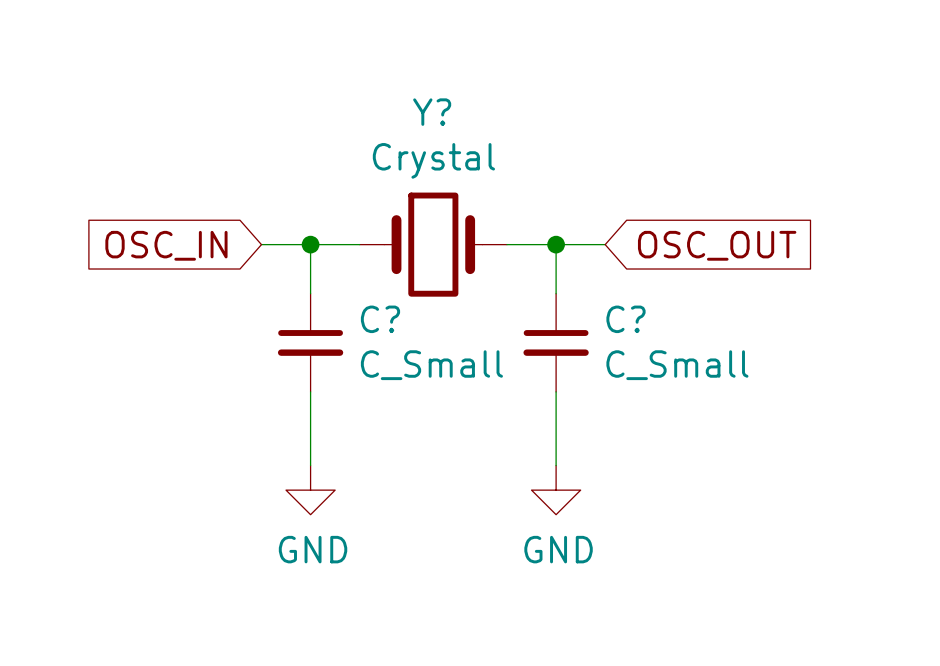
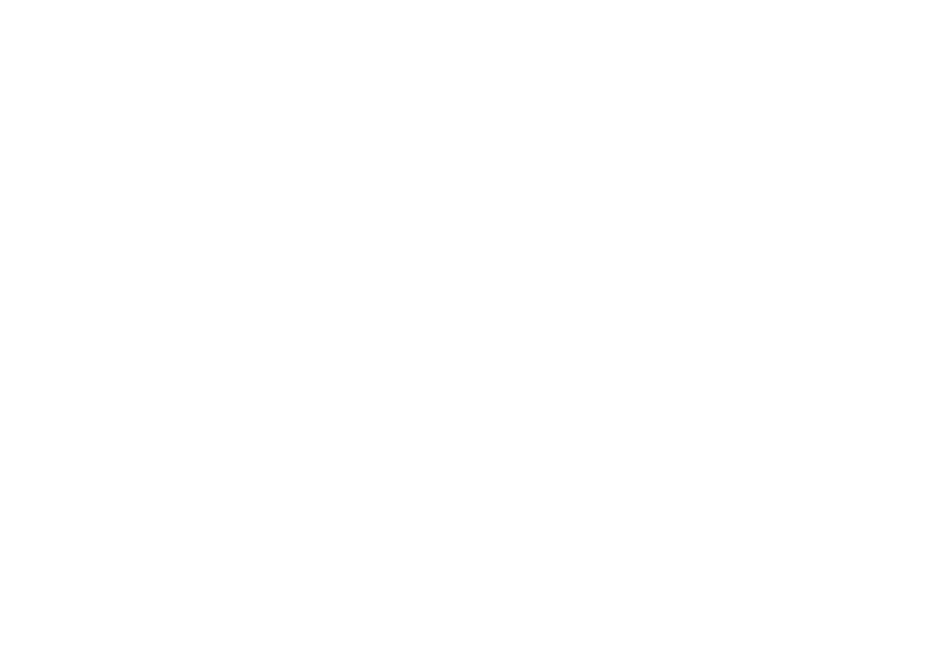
wire: (261, 244) (359, 244) -> none
wire: (310, 244) (310, 293) -> none
junction: (310, 244) -> none
Y?: Crystal (433, 244) -> none
wire: (506, 244) (605, 244) -> none
wire: (556, 244) (556, 293) -> none
junction: (556, 244) -> none
global label: OSC_IN (166, 245) -> none
global label: OSC_OUT (717, 245) -> none
C?: C_Small (310, 342) -> none
C?: C_Small (556, 342) -> none
wire: (310, 391) (310, 465) -> none
wire: (556, 391) (556, 465) -> none
power symbol: GND (310, 490) -> none
power symbol: GND (556, 490) -> none

